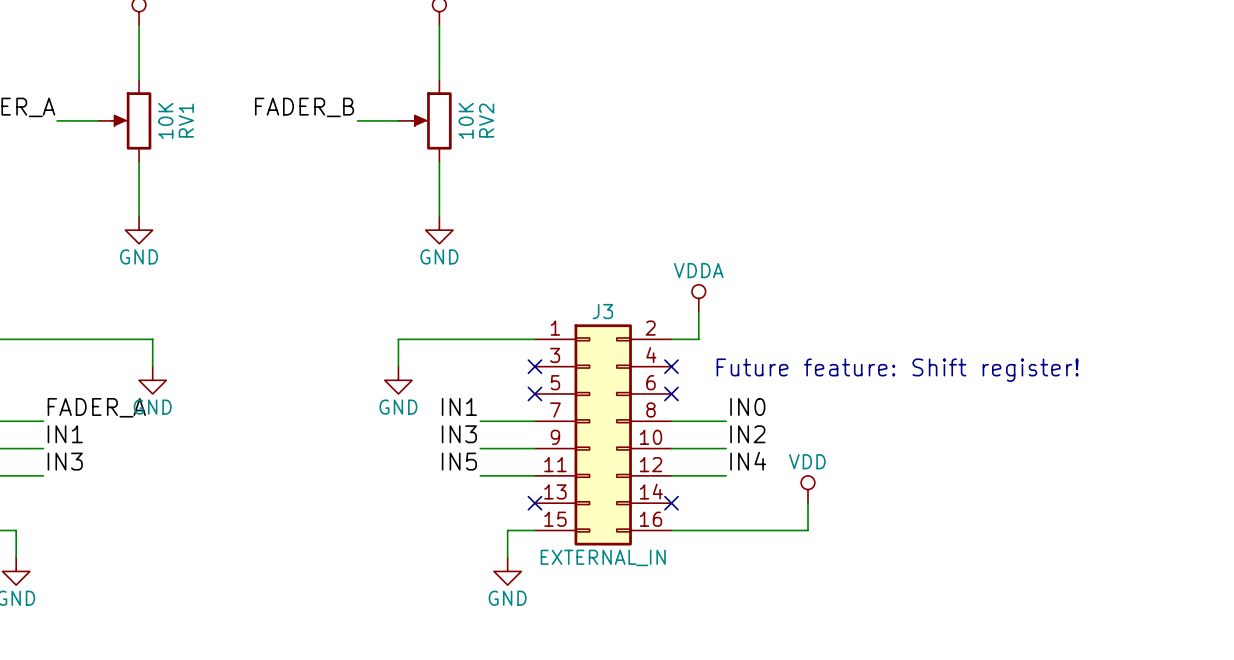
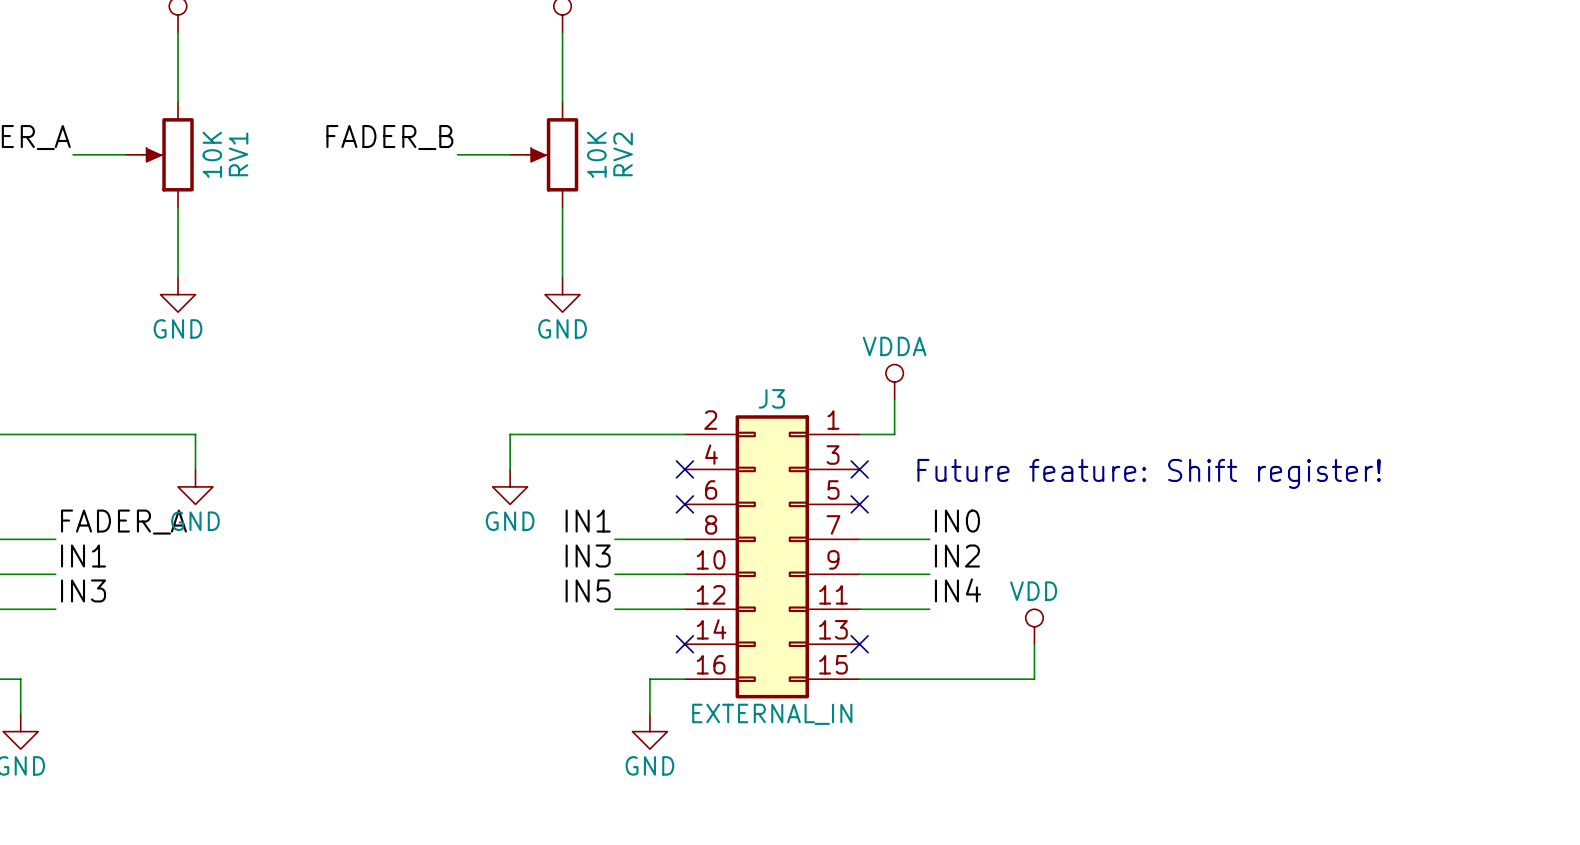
RV1 flip: as is (131, 120) -> up-down (168, 154)
RV2 flip: as is (431, 120) -> up-down (552, 154)
J3 flip: as is (603, 434) -> left-right (772, 556)

